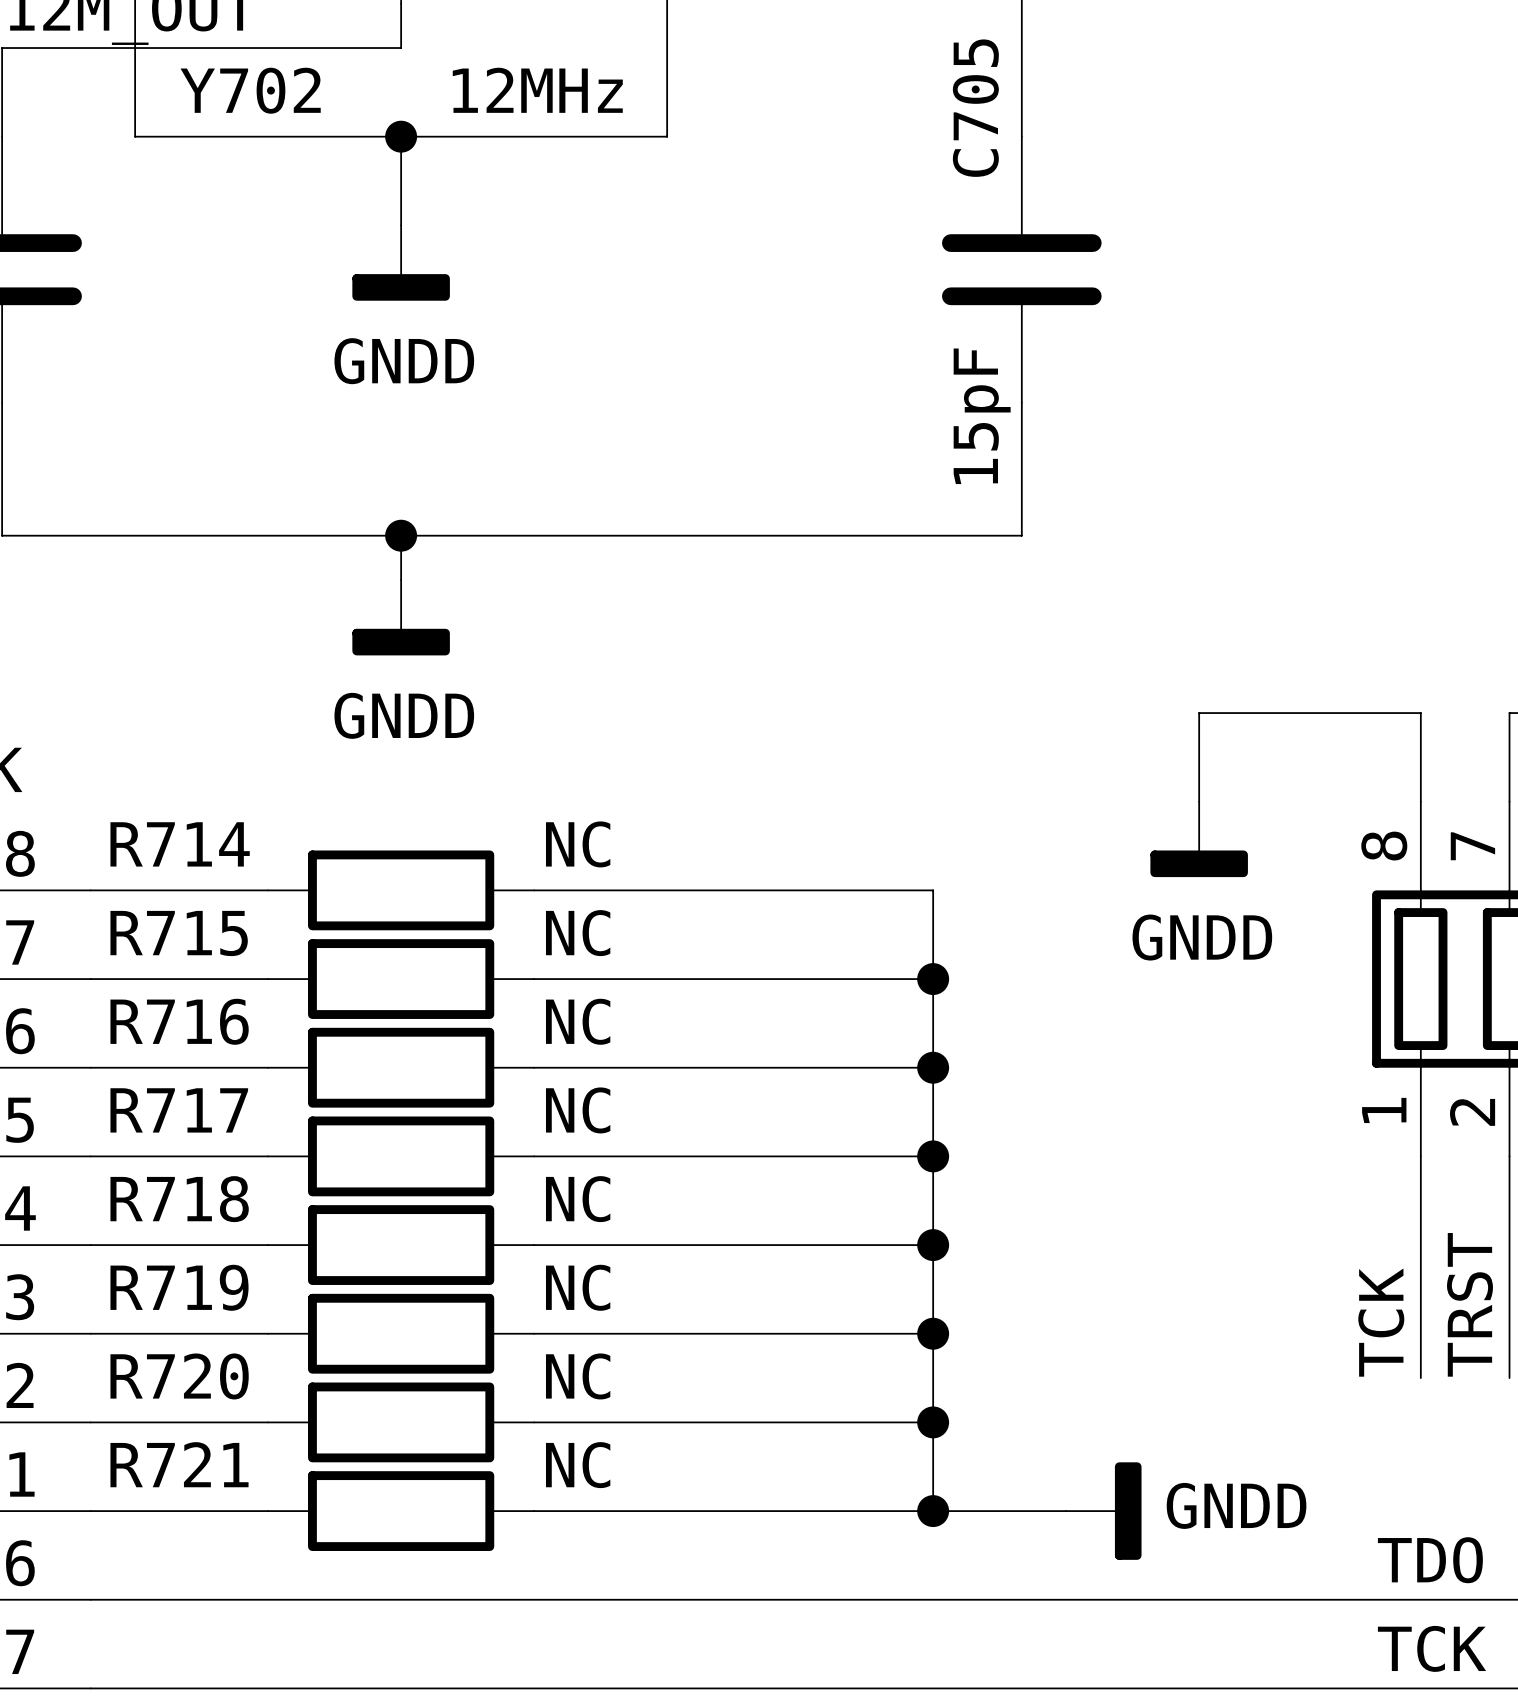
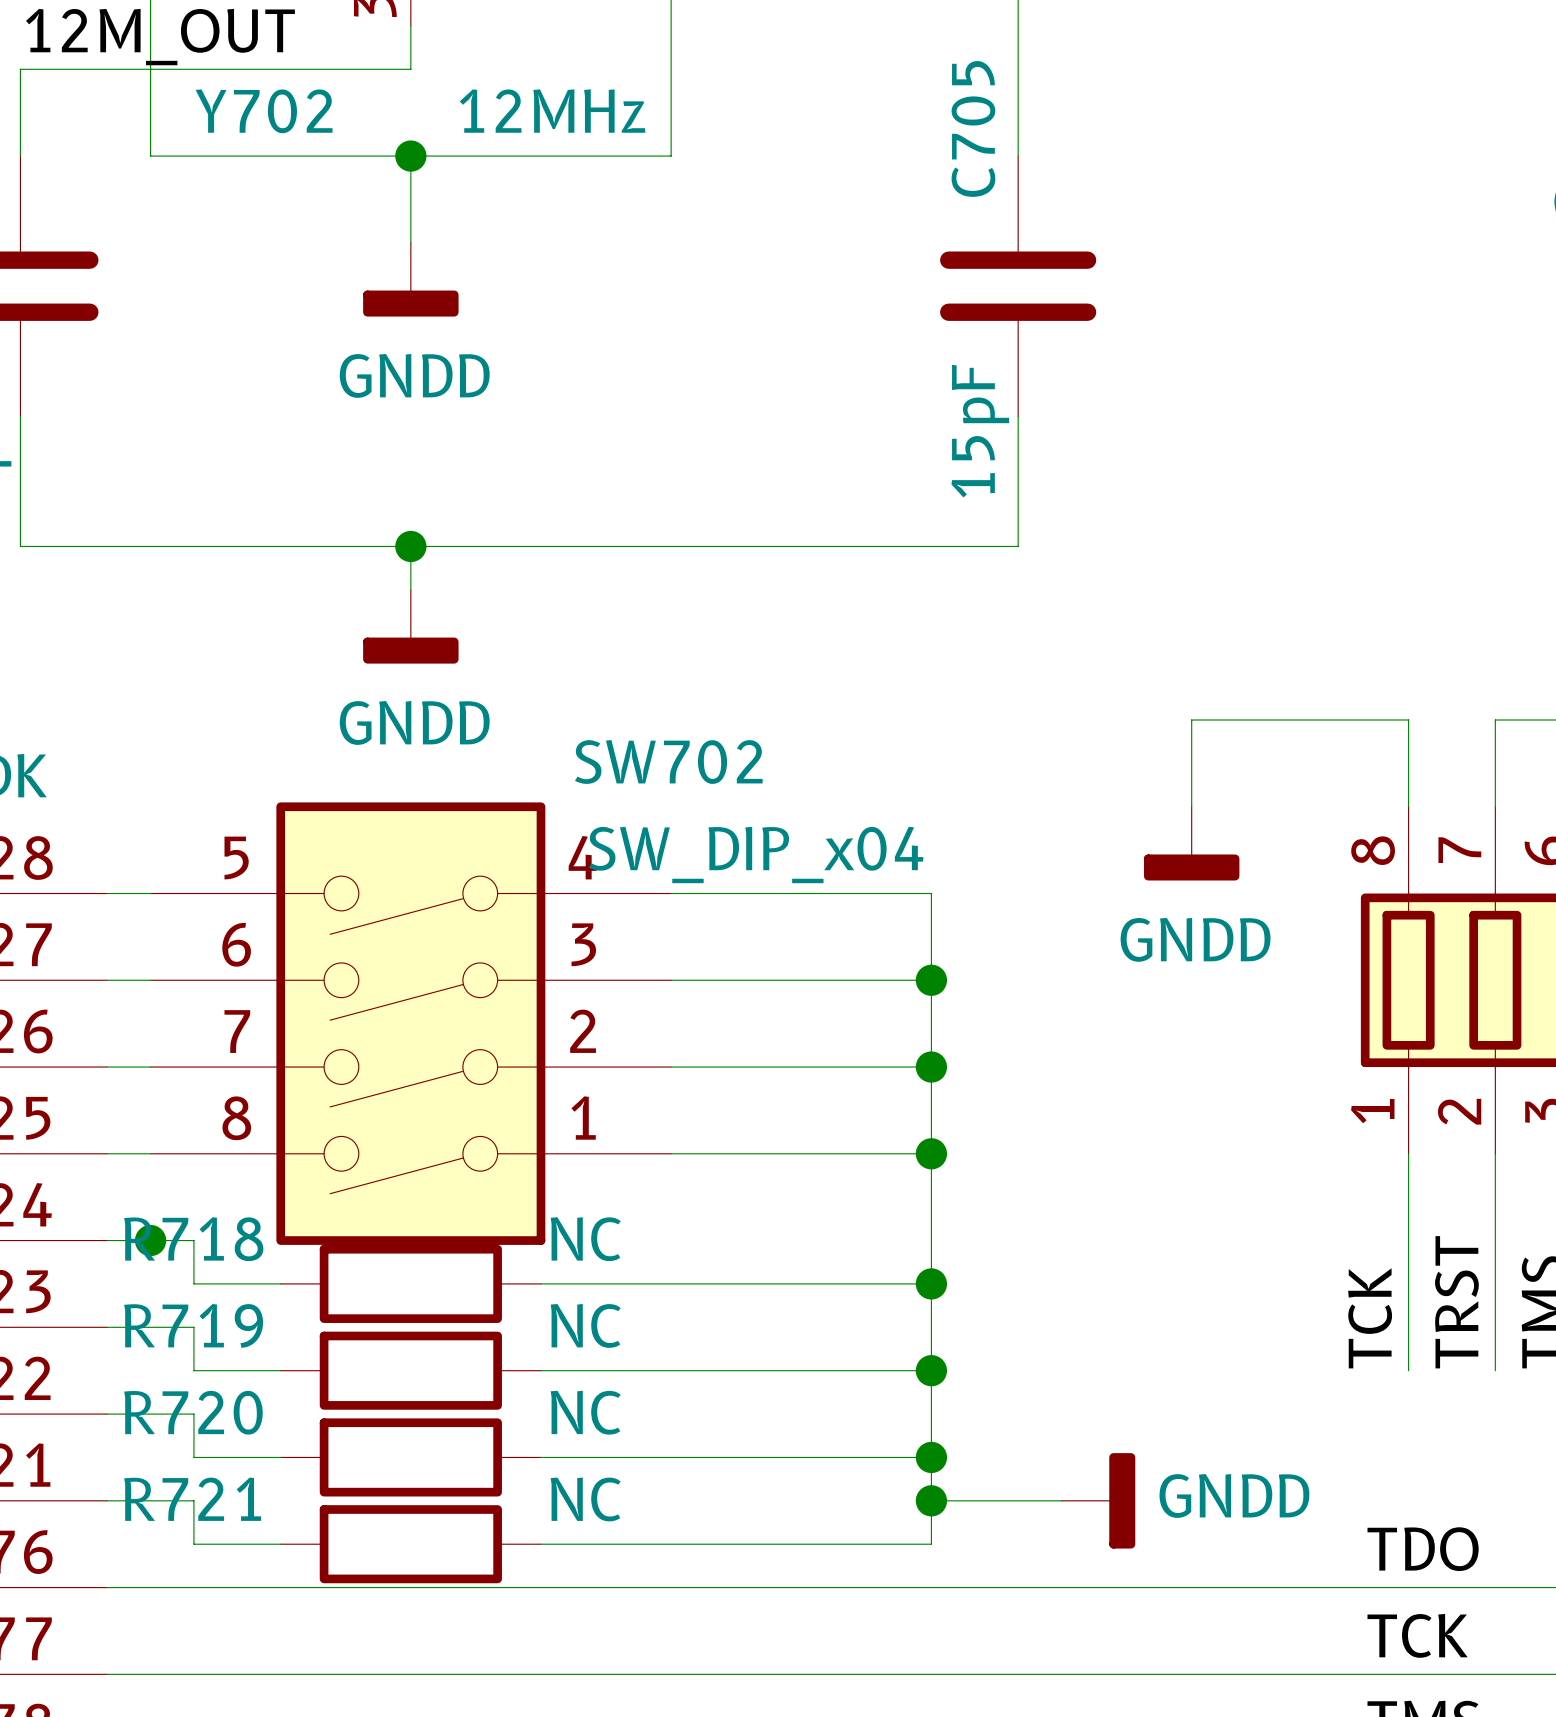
R714: NC (401, 890) -> none
R715: NC (401, 979) -> none
SW702: none -> SW_DIP_x04 (410, 1023)
R716: NC (401, 1067) -> none
R717: NC (401, 1156) -> none
junction: none -> (150, 1240)
wire: (179, 1245) (268, 1245) -> (193, 1240) (193, 1283) (280, 1283)
R718 position: (401, 1245) -> (410, 1283)
wire: (534, 1245) (933, 1245) -> (540, 1370) (931, 1370)
junction: (933, 1245) -> none
junction: none -> (931, 1283)
wire: (179, 1333) (268, 1333) -> (193, 1327) (193, 1370) (280, 1370)
R719 position: (401, 1333) -> (410, 1370)
wire: (534, 1333) (933, 1333) -> (540, 1283) (931, 1283)
junction: (933, 1333) -> none
junction: none -> (931, 1370)
wire: (179, 1422) (268, 1422) -> (193, 1414) (193, 1457) (280, 1457)
R720 position: (401, 1422) -> (410, 1457)
wire: (534, 1422) (933, 1422) -> (540, 1457) (931, 1457)
junction: (933, 1422) -> none
junction: none -> (931, 1457)
wire: (179, 1511) (268, 1511) -> (193, 1500) (193, 1544) (280, 1544)
R721 position: (401, 1511) -> (410, 1544)
wire: (534, 1511) (933, 1511) -> (540, 1544) (931, 1544) (931, 1500)

